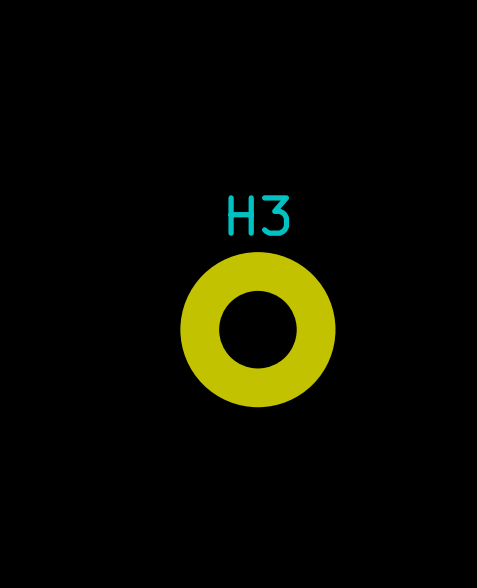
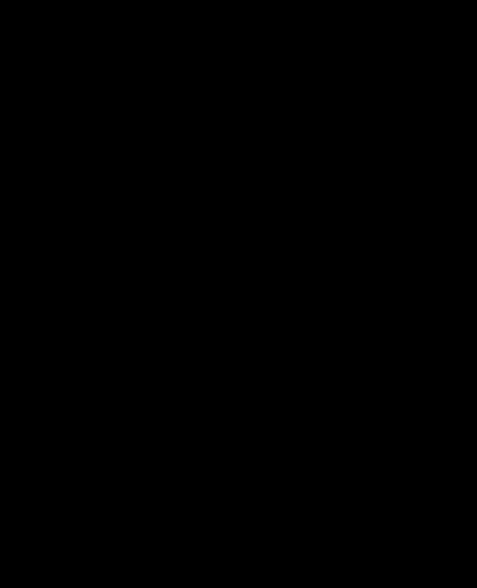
H3: (257, 329) -> none

